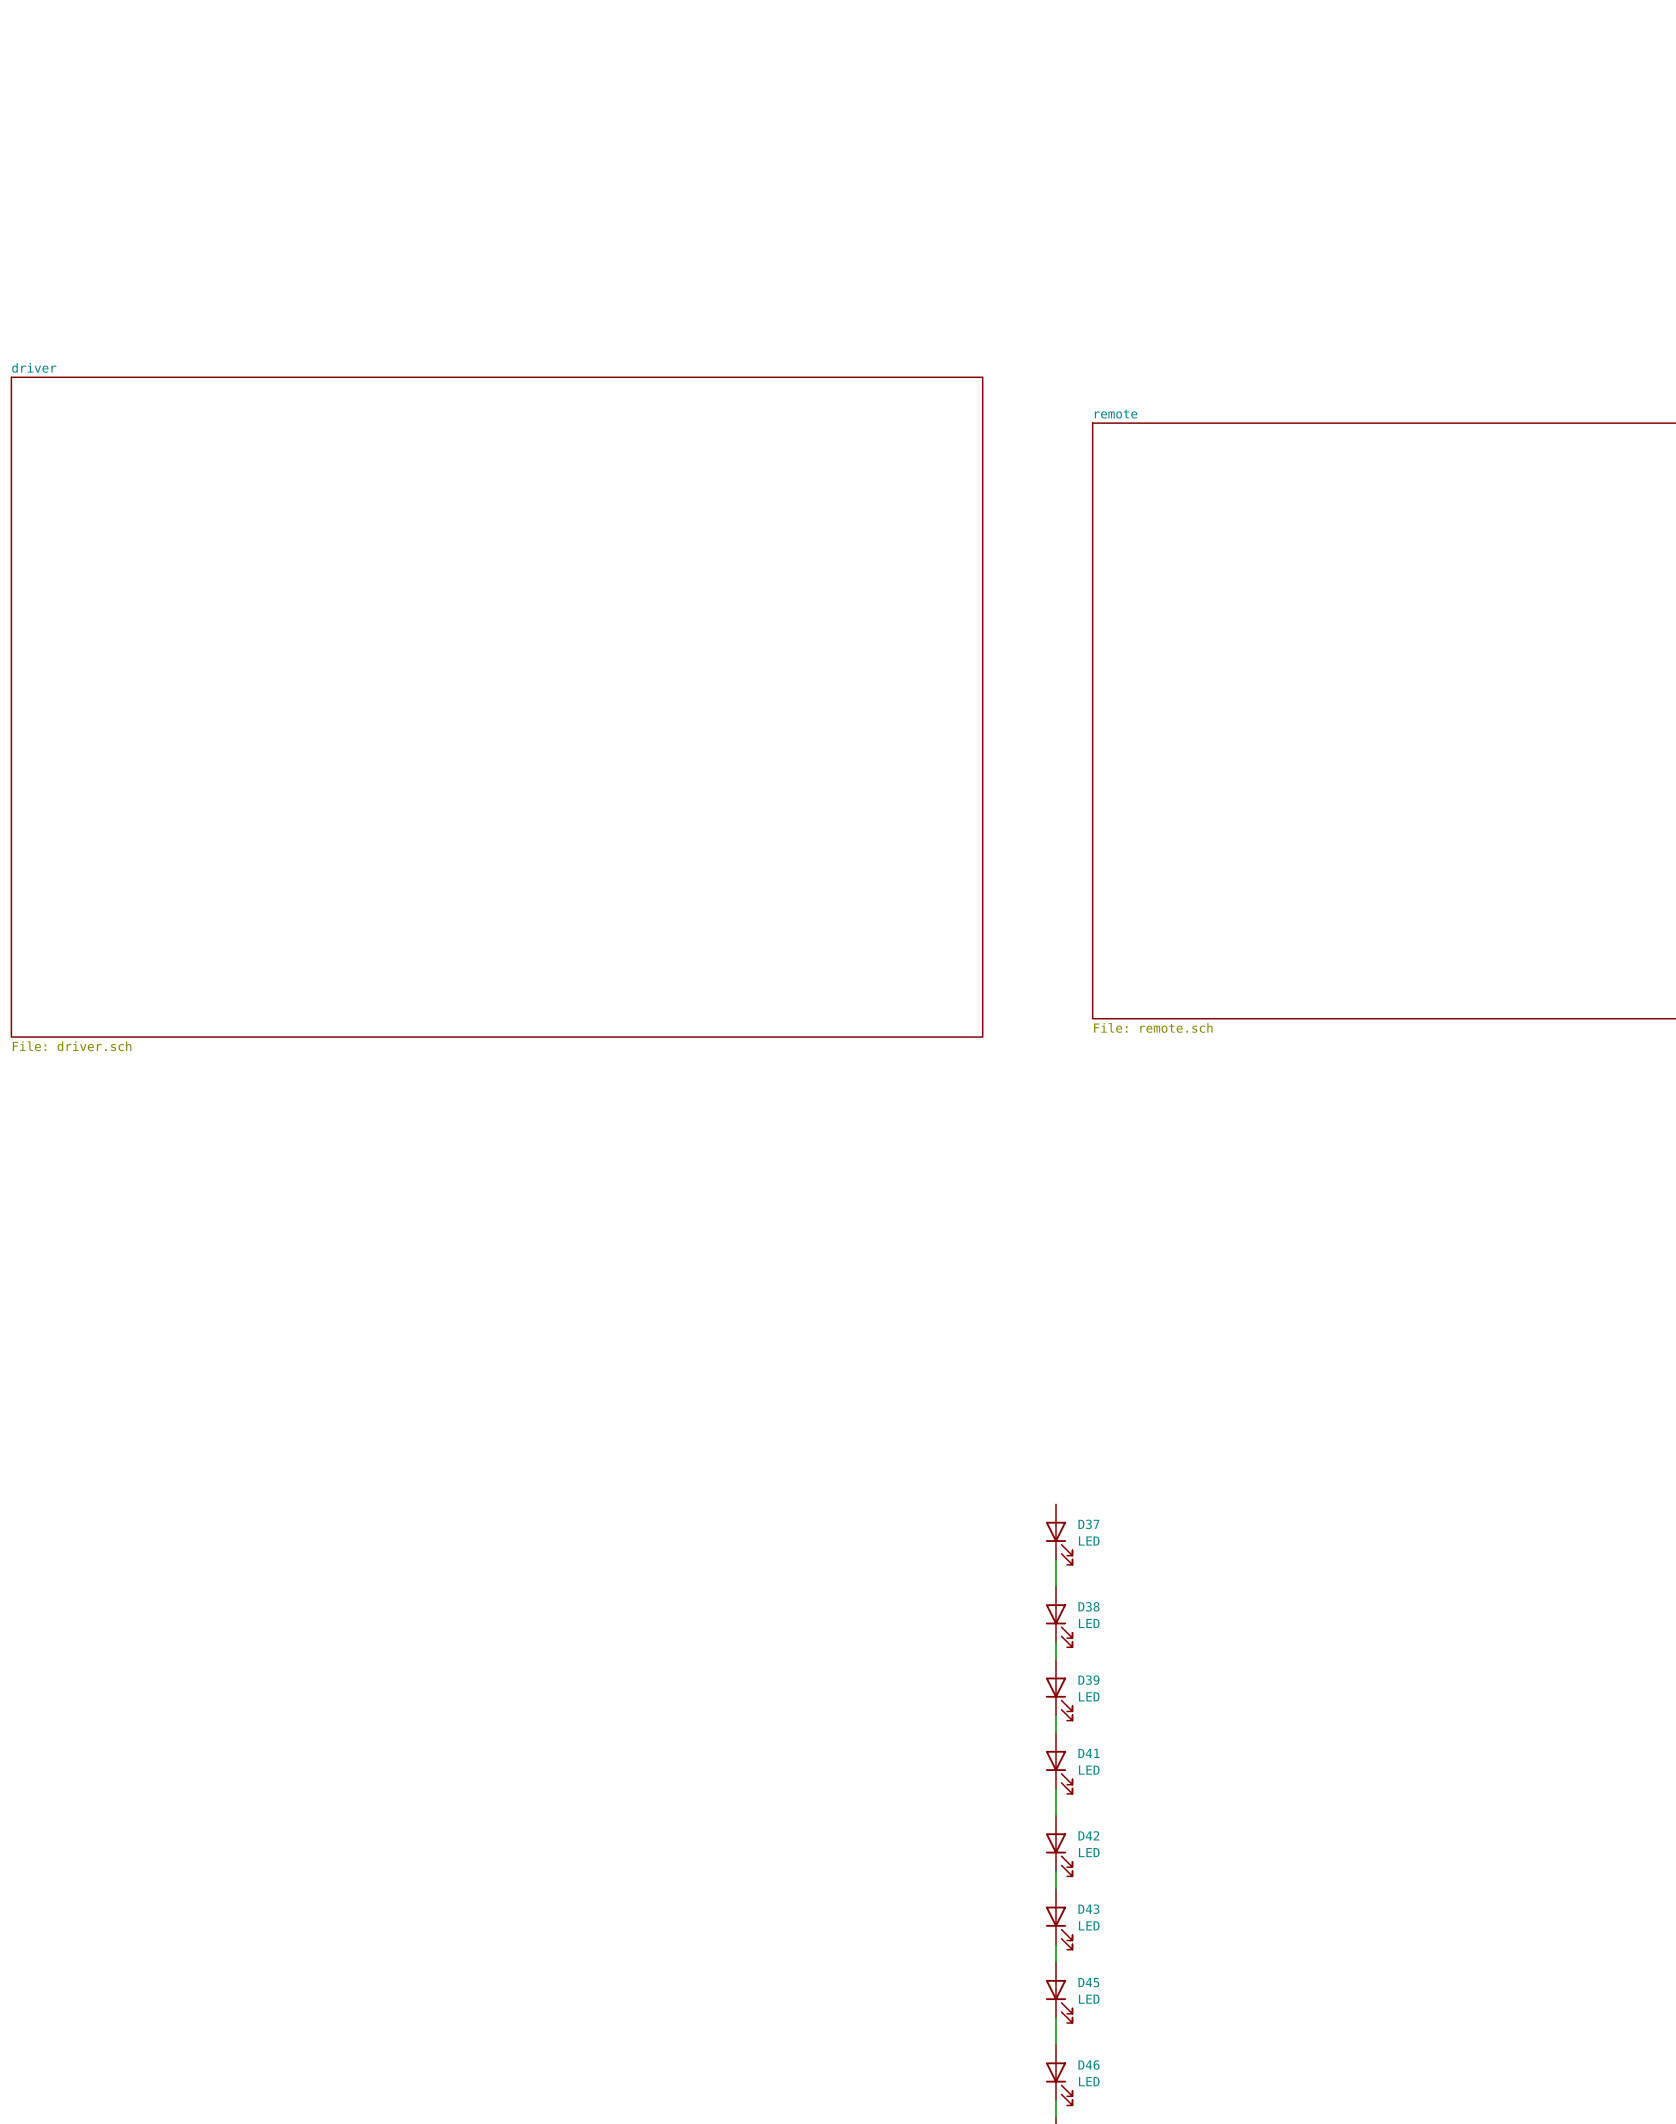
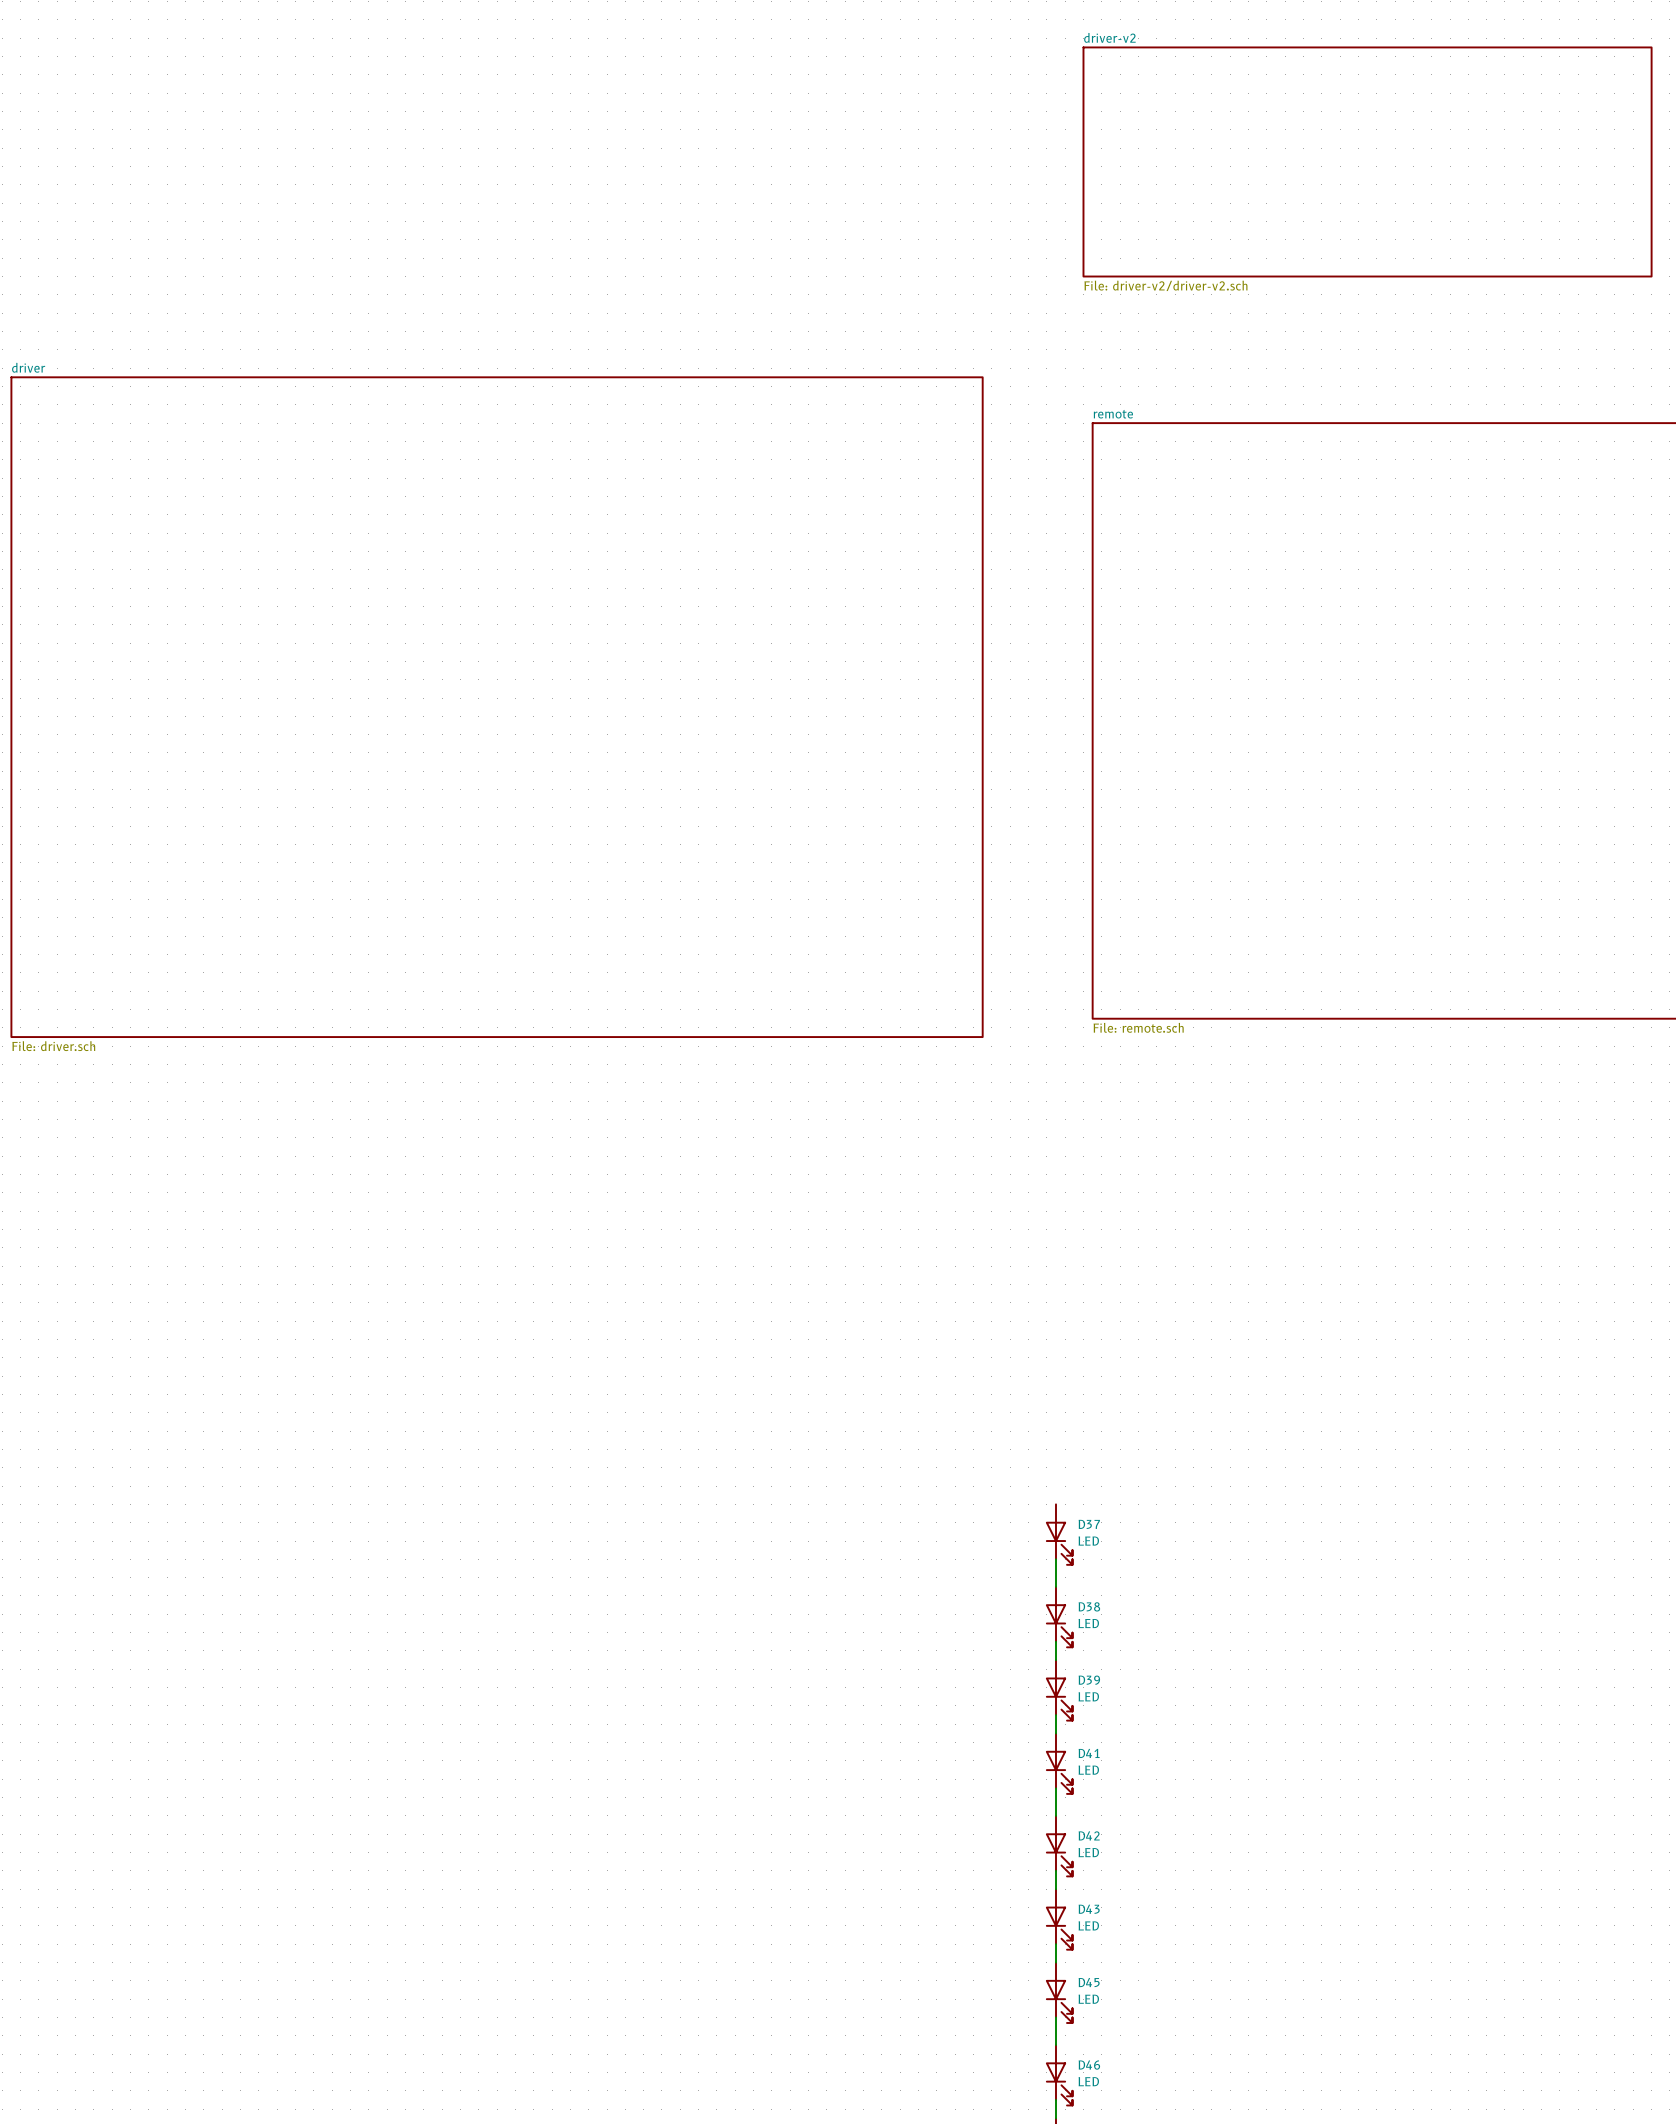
sheet driver-v2: none -> File: driver-v2/driver-v2.sch (1367, 161)

